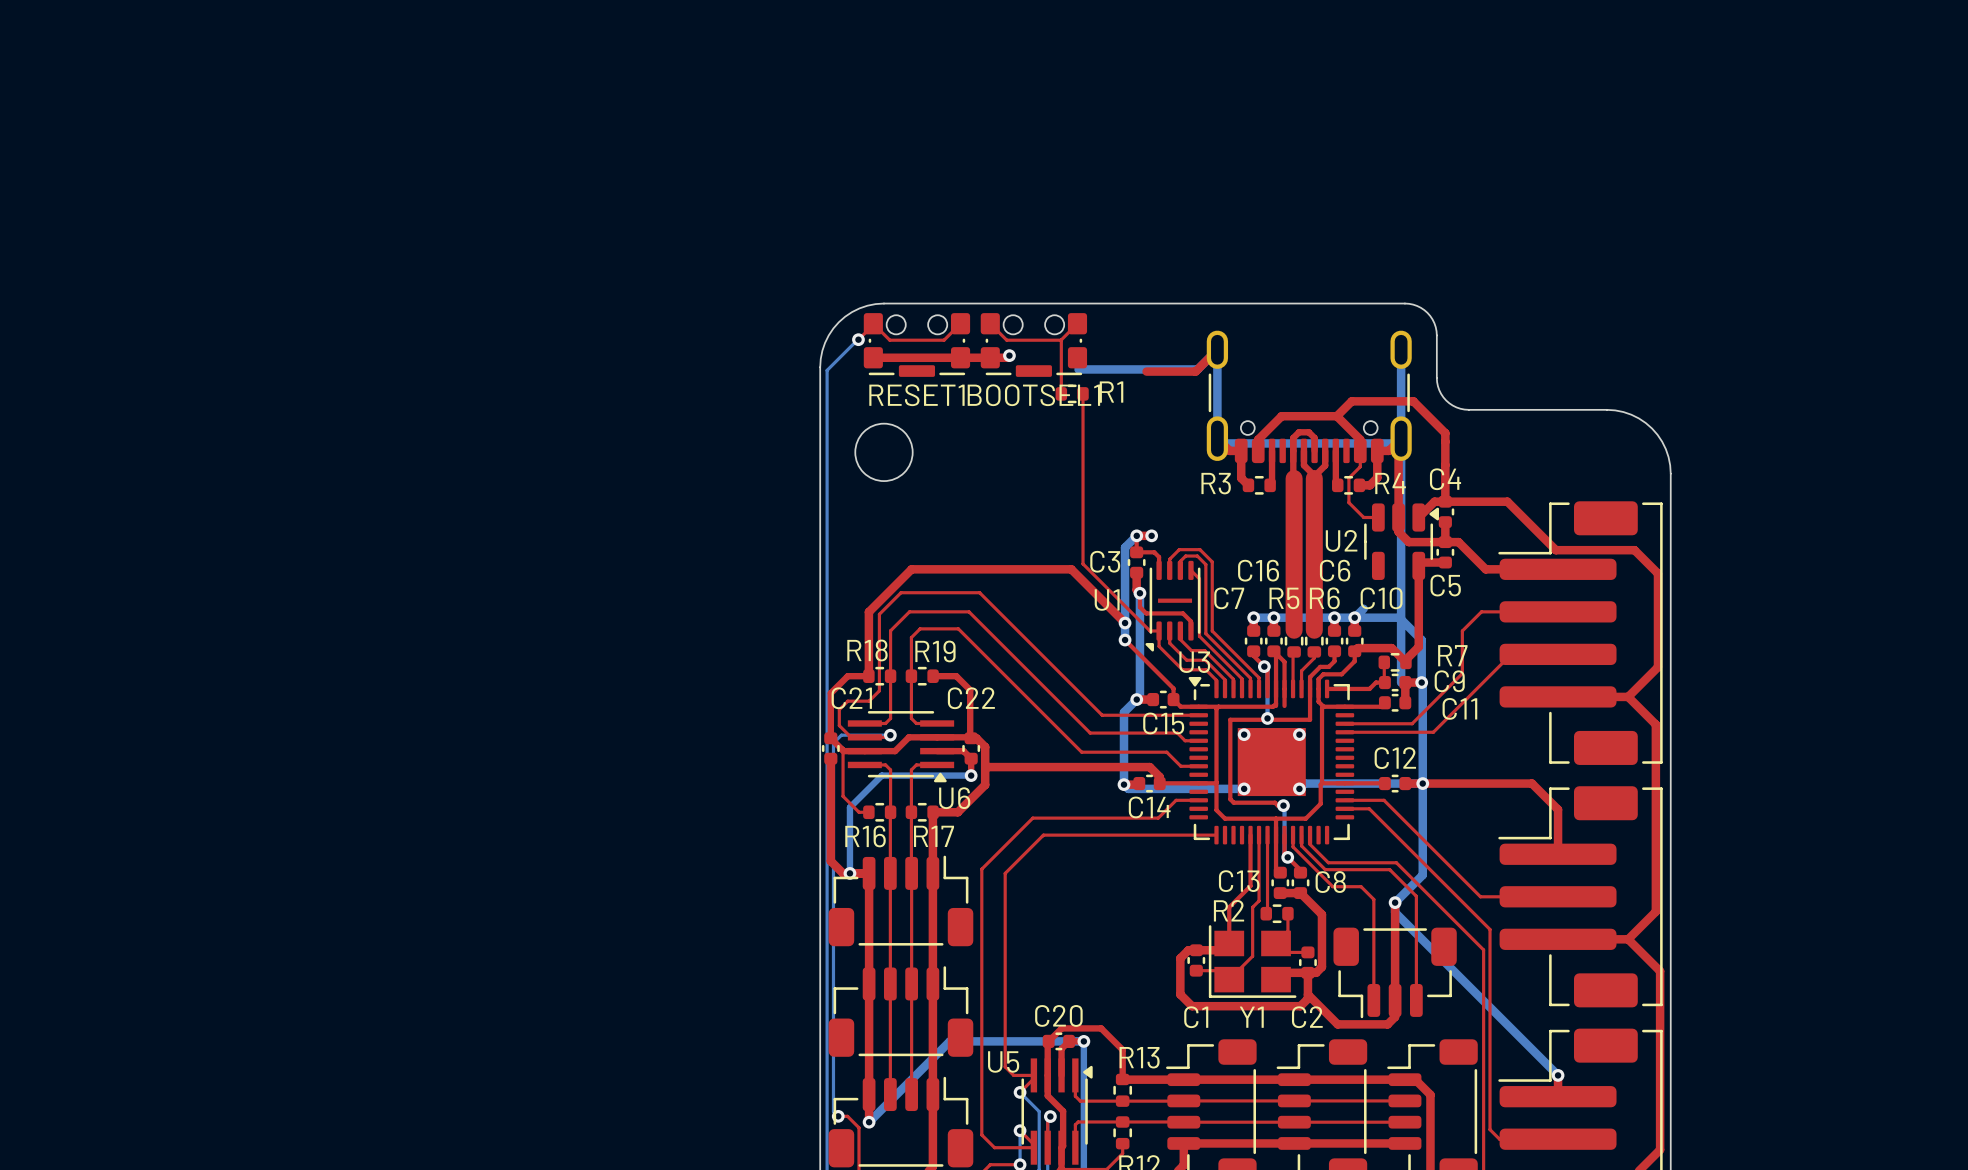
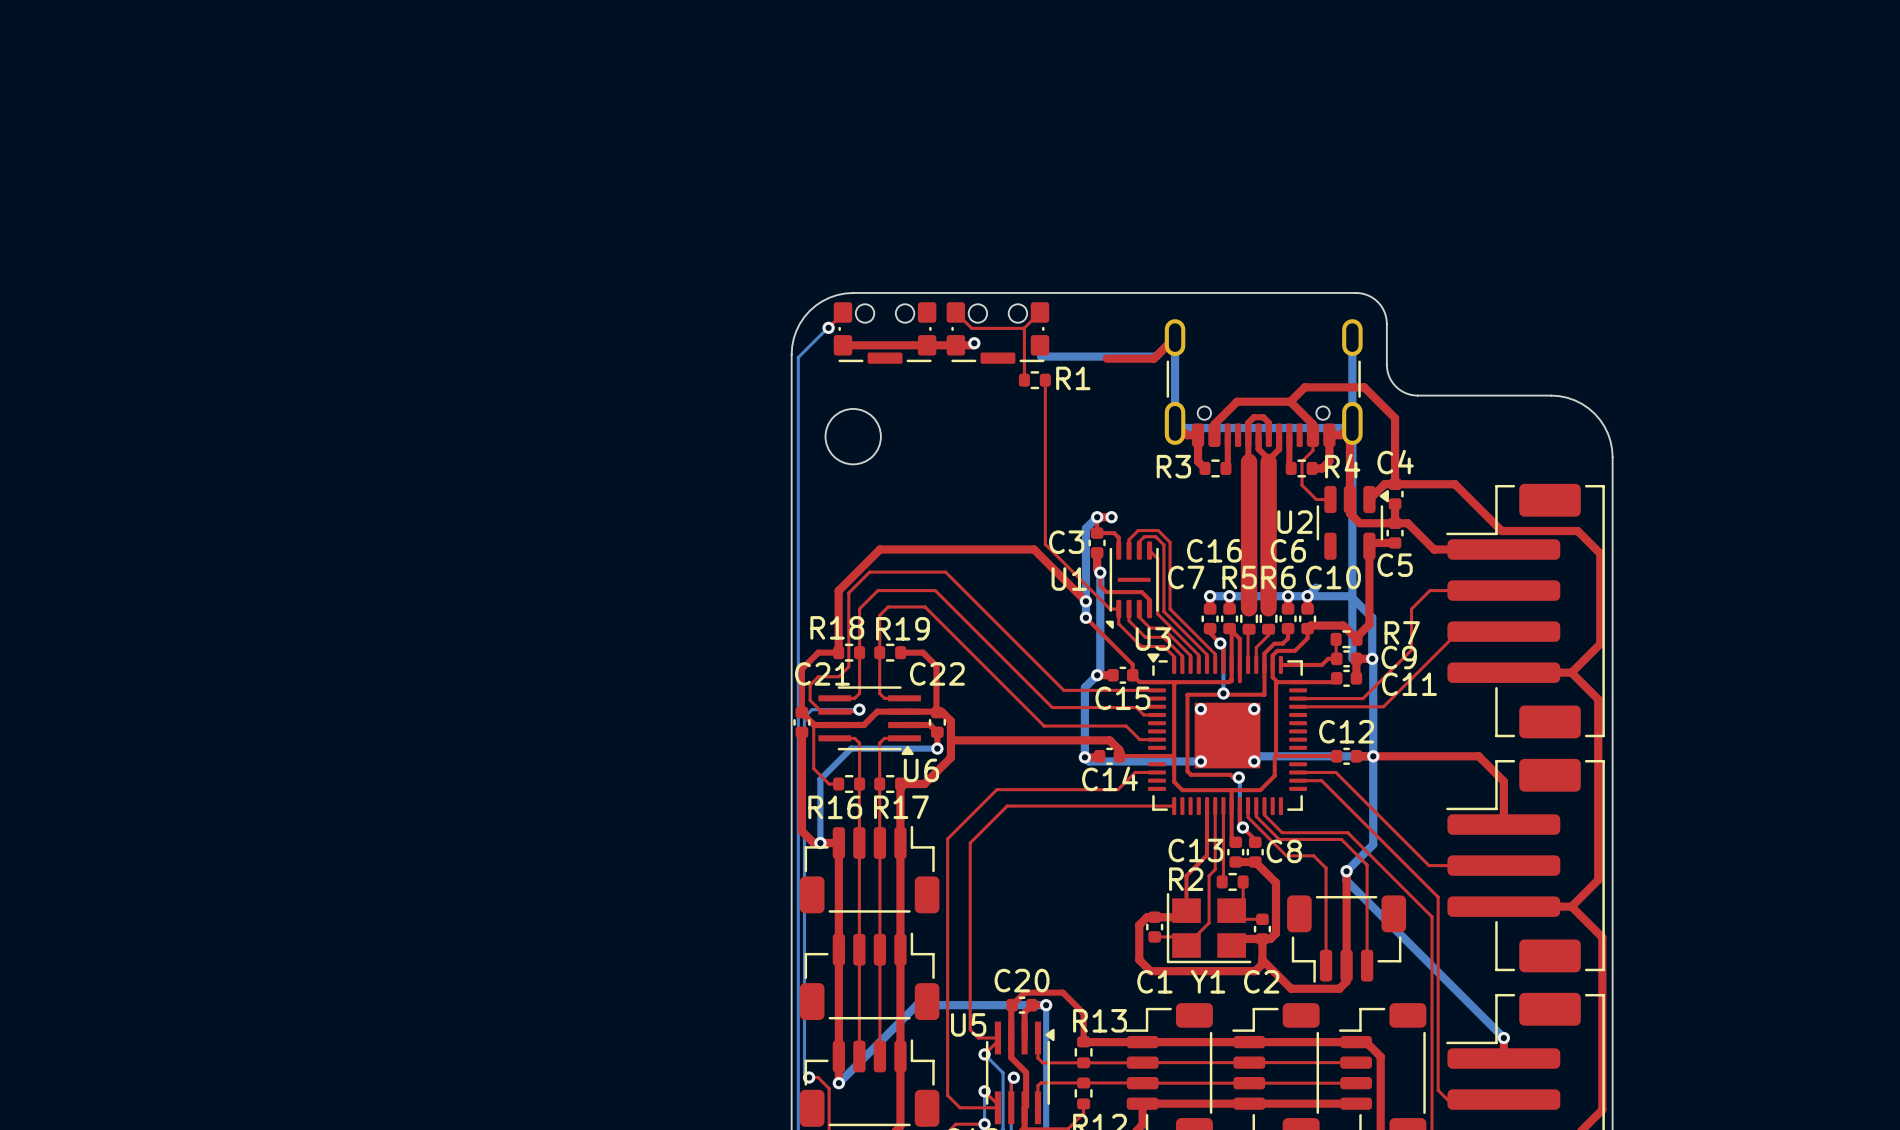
top track: (873, 323) (889, 340) (944, 340) (960, 323) -> none
RESET1 name: RESET1 (916, 395) -> none
BOOTSEL1 name: BOOTSEL1 (1033, 395) -> none

